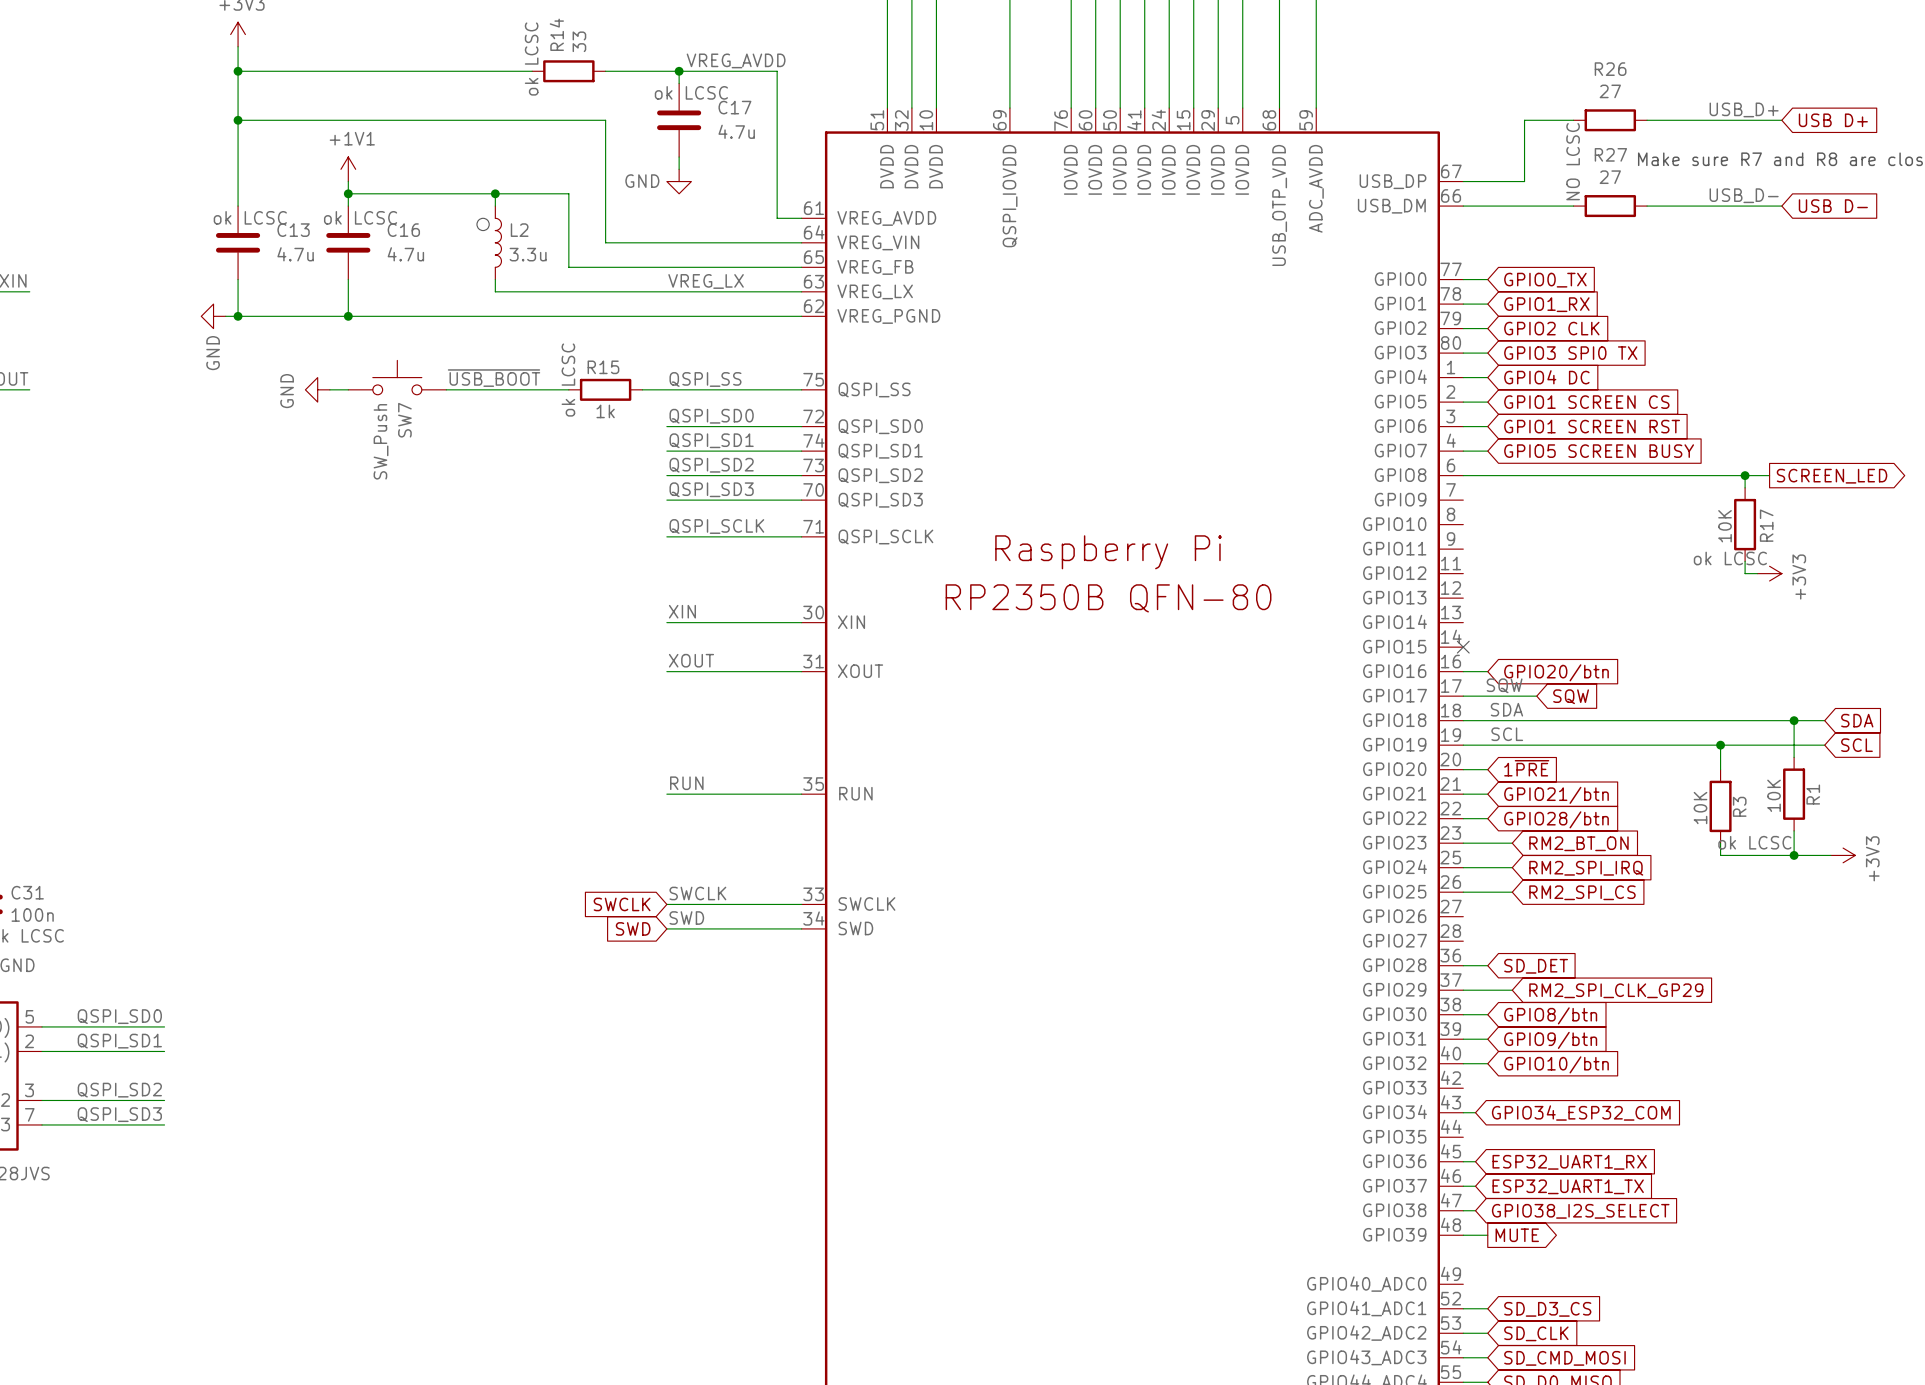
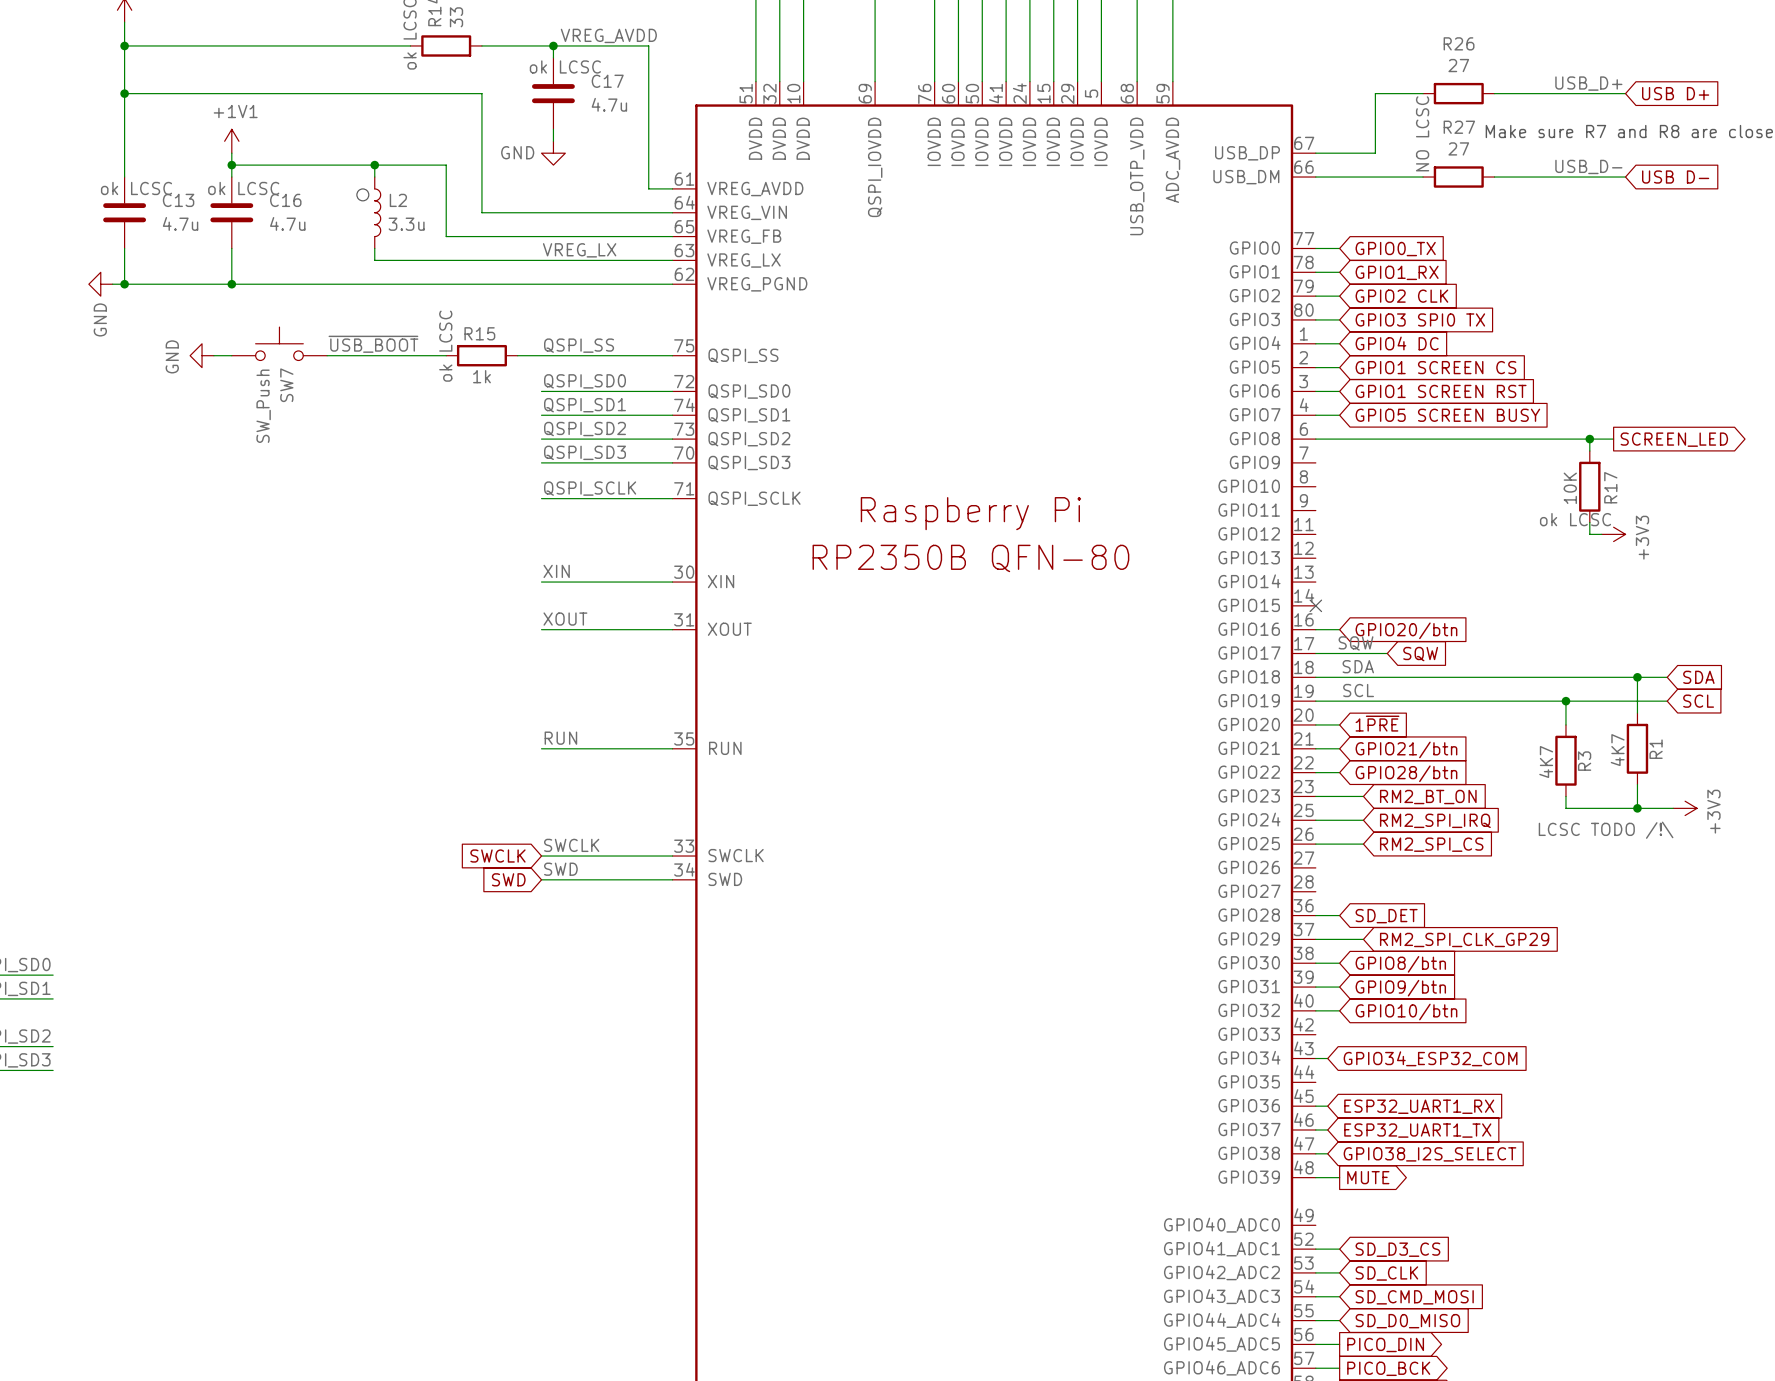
R1 value: 10K (1774, 795) -> 4K7 (1617, 750)
R3 value: 10K (1700, 808) -> 4K7 (1546, 761)
R3 text: ok LCSC (1754, 842) -> LCSC TODO /!\ (1606, 830)

